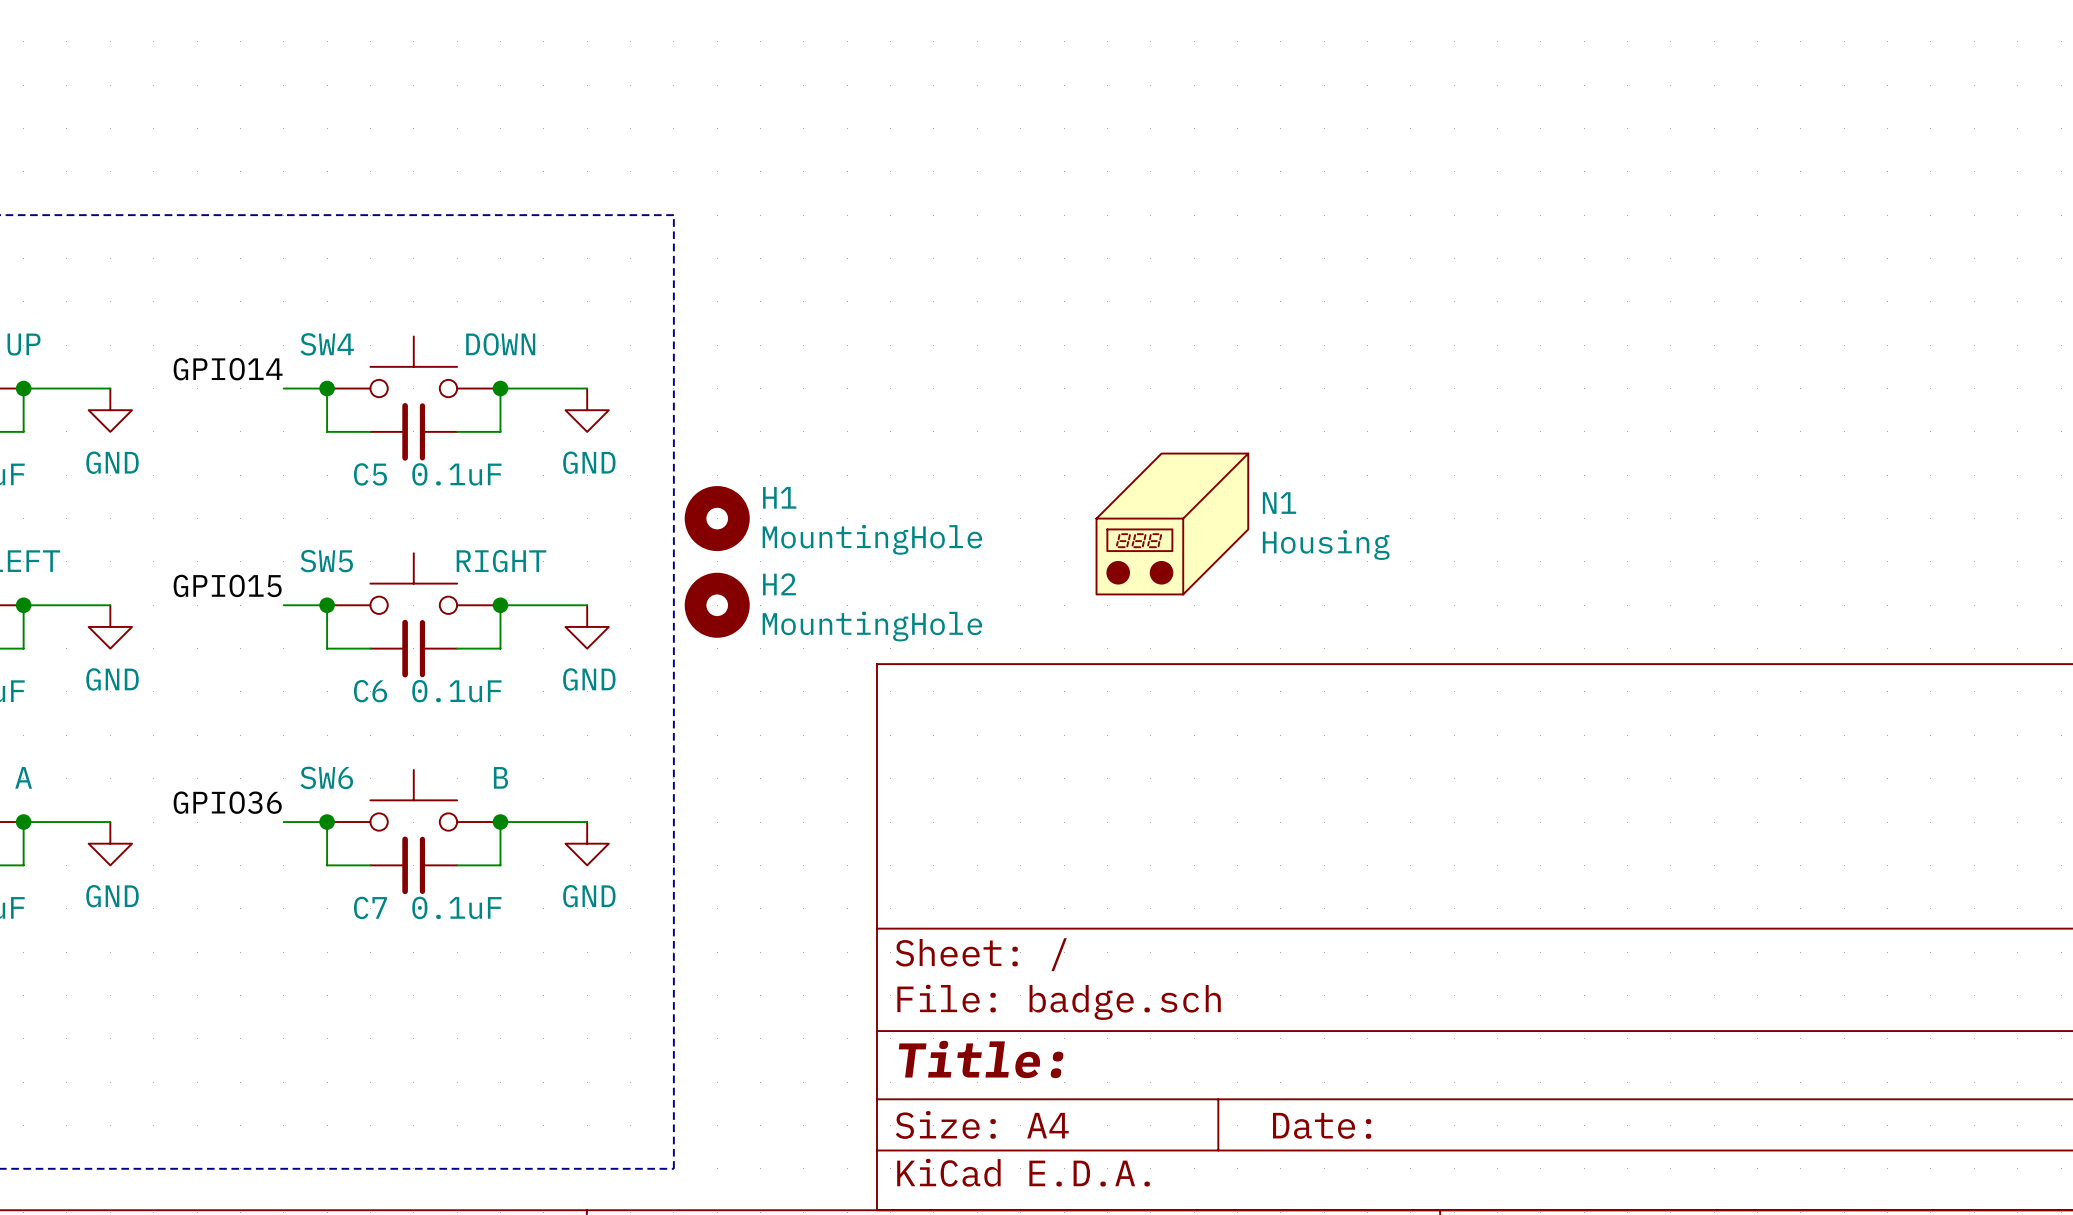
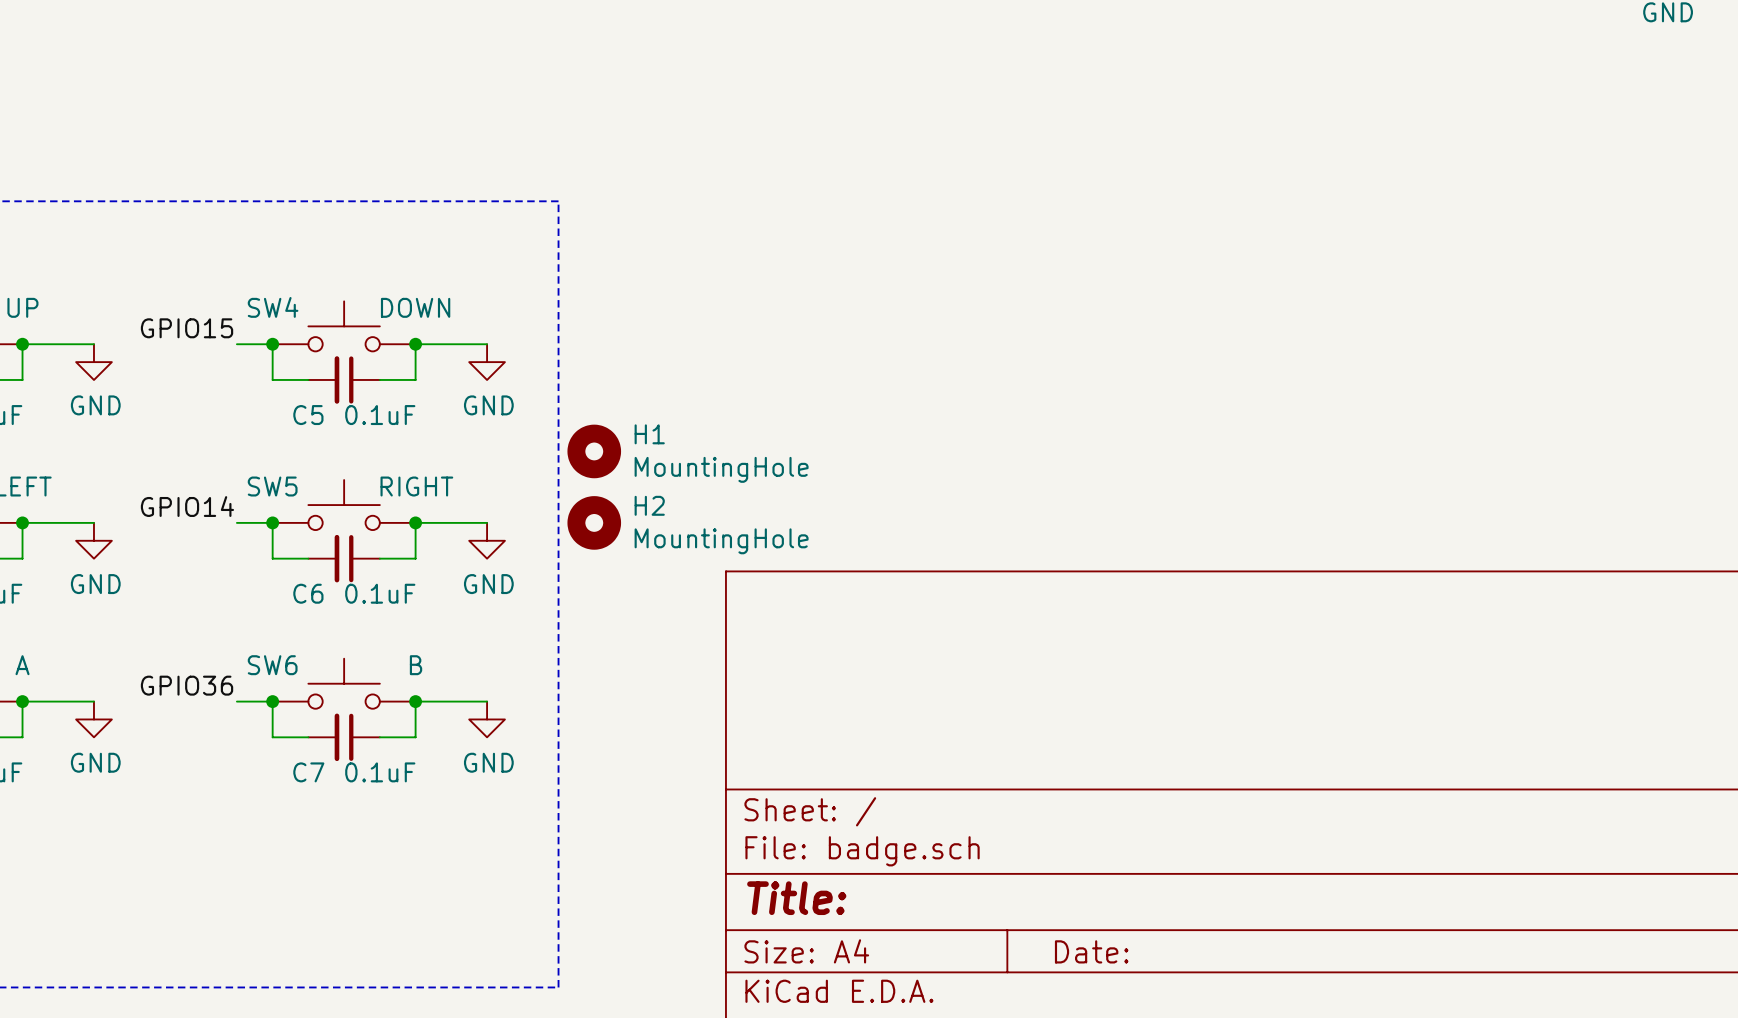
label: GPIO14 (228, 369) -> GPIO15 (187, 328)
N1: Housing (1172, 524) -> none
label: GPIO15 (227, 585) -> GPIO14 (187, 506)

